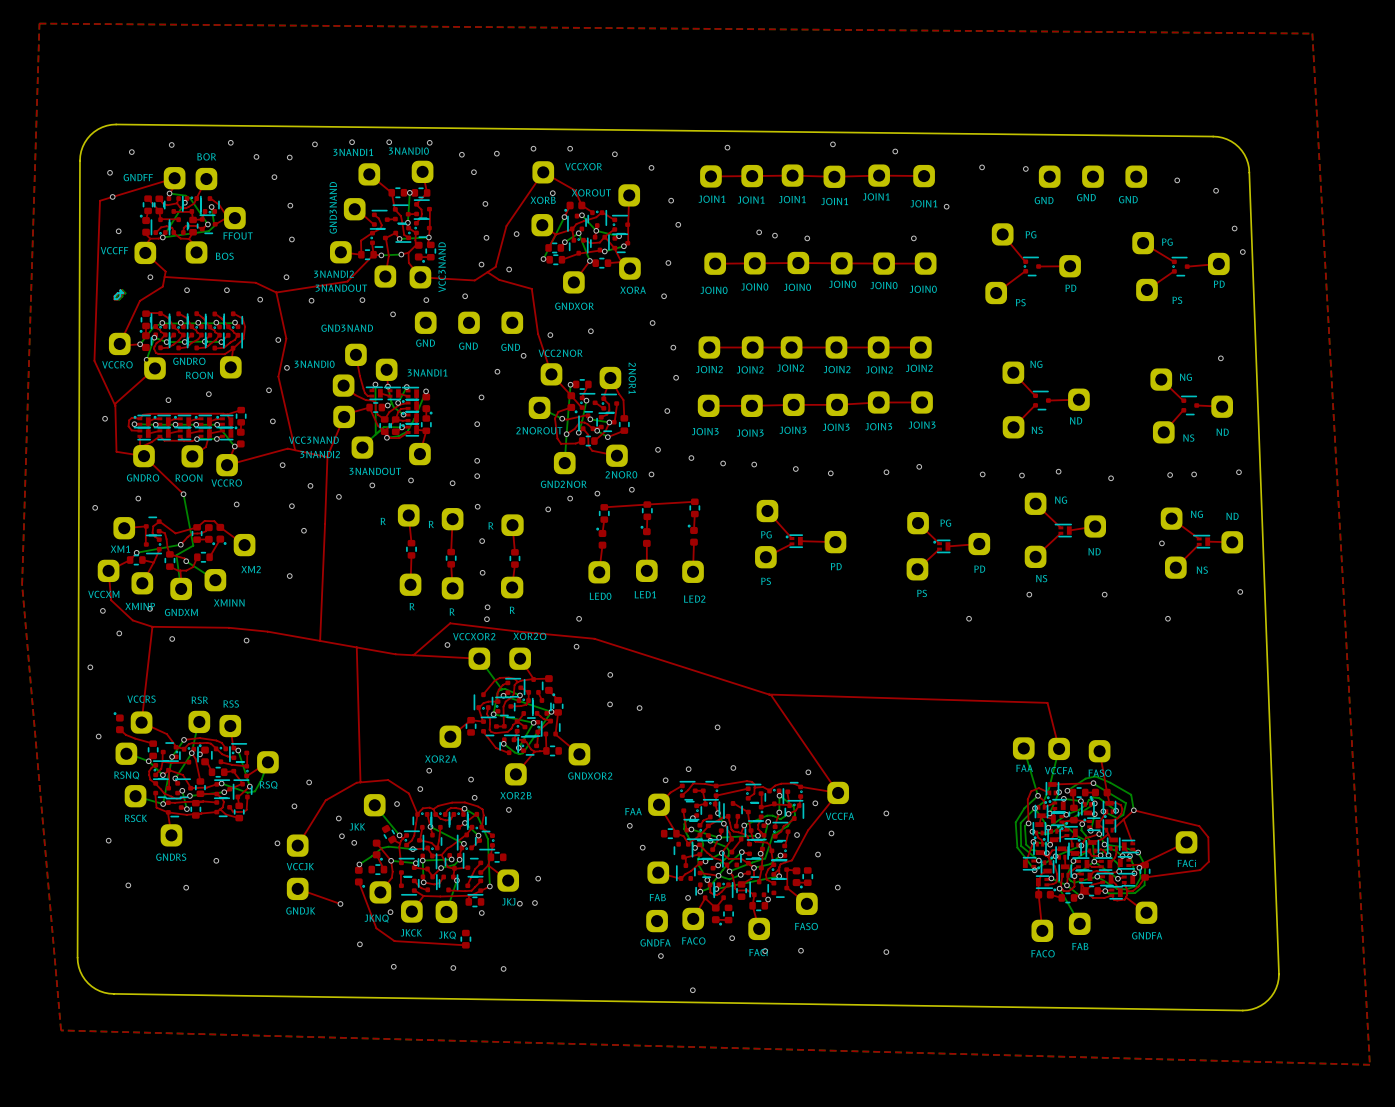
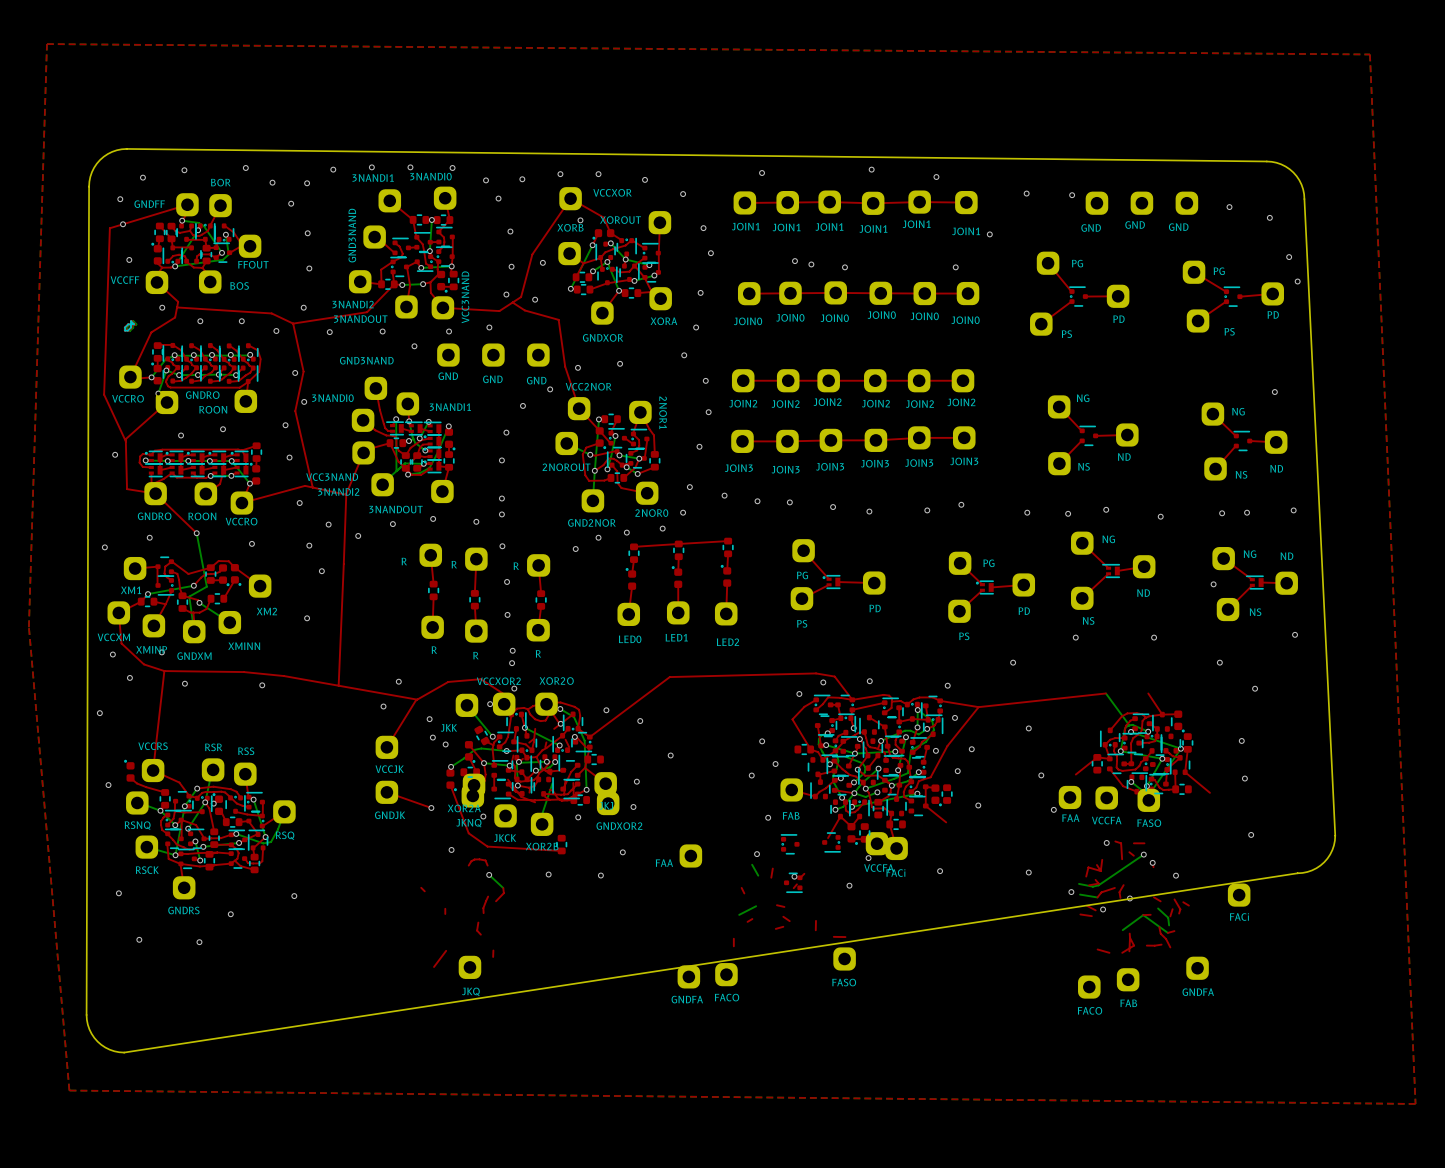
top zone outline: (1312, 33) (1369, 1064) (61, 1030) -> (1369, 54) (1415, 1103) (69, 1090)
board edge: (1249, 172) (1278, 974) (1274, 992) (1264, 1003) (1252, 1009) (1242, 1010) (113, 993) -> (1304, 199) (1335, 835) (1330, 854) (1320, 865) (1302, 872) (124, 1052)
via: (579, 618) -> none
via: none -> (869, 681)
via: none -> (398, 681)
via: none -> (823, 682)
via: none -> (947, 685)
via: none -> (514, 688)
via: none -> (1255, 688)
via: (447, 644) -> none
via position: (576, 646) -> (606, 710)
top track: (356, 647) (360, 782) -> none
via: none -> (799, 693)
top track: none -> (1105, 693) (978, 707)
bottom track: none -> (1105, 693) (1129, 725)
top track: none -> (1148, 693) (1162, 714)
top track: (395, 654) (479, 658) -> none
top track: none -> (852, 699) (889, 695) (891, 698) (891, 708) (884, 712)
top track: none -> (852, 699) (828, 697) (816, 709)
top track: none -> (852, 699) (834, 676) (816, 673) (669, 677) (589, 737) (578, 728) (580, 715) (579, 709) (574, 706) (560, 702) (547, 702) (527, 709)
top track: (413, 655) (450, 623) (594, 638) (771, 695) (838, 792) -> none
via: none -> (490, 704)
bottom track: (479, 658) (501, 689) -> none
part: none -> (823, 704)
part: none -> (845, 704)
via: none -> (383, 706)
part: none -> (932, 705)
part: none -> (891, 707)
via: none -> (560, 709)
via: none -> (917, 710)
part: none -> (912, 711)
top track: none -> (1162, 714) (1149, 716) (1142, 720) (1140, 733) (1133, 738) (1131, 743) (1131, 763) (1124, 763)
top track: none -> (1178, 714) (1162, 714)
via: none -> (954, 717)
top track: none -> (1146, 717) (1142, 714) (1127, 713) (1121, 716) (1110, 730)
top track: none -> (1135, 718) (1126, 725) (1124, 738) (1110, 739) (1105, 744) (1109, 758) (1097, 757) (1075, 774)
via: none -> (429, 719)
part: none -> (516, 721)
part: none -> (573, 721)
part: none -> (1162, 721)
part: none -> (1179, 721)
via: none -> (560, 723)
part: none -> (1142, 723)
top track: none -> (1149, 723) (1157, 729) (1155, 741) (1139, 743)
top track: (548, 678) (533, 679) (516, 682) (512, 696) (505, 701) (503, 706) (503, 726) (496, 726) -> none
part: none -> (869, 724)
part: none -> (824, 725)
part: none -> (845, 725)
part: none -> (892, 726)
part: none -> (933, 727)
via: none -> (524, 727)
via: none -> (853, 728)
bottom track: none -> (917, 727) (917, 710) (932, 721) (933, 729) (926, 741) (911, 750) (907, 773) (865, 788)
via: none -> (917, 727)
top track: (507, 682) (498, 689) (497, 701) (483, 703) (478, 708) (483, 721) (471, 720) (450, 736) -> none
top track: (518, 682) (514, 678) (499, 677) (494, 680) (483, 694) -> none
via: none -> (927, 728)
via: none -> (1028, 728)
part: (550, 685) -> none
bottom track: none -> (1131, 731) (1180, 748) (1151, 791) (1142, 790) (1131, 781)
via: none -> (1131, 731)
bottom track: none -> (1148, 731) (1132, 724) (1128, 725) (1125, 728) (1120, 751) (1162, 758) (1146, 786)
via: none -> (1148, 731)
part: (533, 686) -> none
via: none -> (827, 733)
part: (514, 687) -> none
top track: (521, 687) (528, 692) (526, 704) (511, 706) -> none
via: none -> (492, 736)
via: none -> (432, 737)
via: none -> (574, 736)
via: none -> (905, 737)
part: none -> (1110, 737)
part footprint: [473, 692, 494, 711] -> [496, 731, 517, 752]
top track: none -> (859, 739) (867, 755) (857, 769) (865, 775) (877, 775) (884, 780)
via: none -> (859, 739)
via: none -> (762, 741)
top track: (769, 694) (1047, 702) (1059, 748) -> none
top track: none -> (843, 741) (858, 732) (864, 732) (867, 745) (884, 752) (886, 760)
via: none -> (881, 740)
via: none -> (1241, 740)
bottom track: (503, 695) (551, 711) (522, 753) (514, 752) (503, 743) -> none
via: (503, 695) -> none
bottom track: (519, 695) (504, 688) (500, 689) (497, 692) (493, 714) (533, 722) (518, 747) -> none
via: (519, 695) -> none
part: none -> (582, 742)
part: none -> (526, 743)
part: none -> (562, 742)
part: none -> (1131, 743)
part: none -> (1152, 743)
part: none -> (1170, 743)
part: none -> (1187, 742)
via: none -> (445, 744)
top track: none -> (1115, 744) (1113, 750) (1116, 755) (1116, 767) (1122, 770) (1135, 769) (1152, 750)
via: none -> (559, 745)
via: none -> (826, 745)
part: none -> (828, 745)
part: none -> (850, 746)
part: none -> (894, 746)
bottom track: none -> (834, 747) (838, 760) (832, 775) (833, 782) (842, 797)
part: none -> (919, 747)
part: none -> (872, 748)
via: none -> (1180, 748)
part: none -> (804, 749)
via: none -> (971, 749)
via: none -> (506, 750)
via: none -> (935, 750)
via: none -> (1120, 751)
top track: none -> (1165, 750) (1172, 756) (1180, 757) (1167, 768)
top track: none -> (1176, 750) (1187, 749) (1185, 772) (1209, 792)
part: none -> (470, 751)
via: (610, 704) -> none
via: none -> (895, 751)
part: (504, 706) -> none
part: (523, 706) -> none
part rotation: 0° (558, 706) -> 90° clockwise (594, 759)
via: none -> (854, 753)
part: (541, 707) -> none
via: (551, 711) -> none
via: none -> (1162, 758)
top track: (537, 713) (543, 719) (550, 720) (538, 731) -> none
top track: (546, 713) (558, 712) (555, 734) (579, 754) -> none
via: none -> (546, 761)
via: none -> (555, 762)
via: none -> (484, 763)
part: none -> (549, 764)
via: none -> (775, 764)
via: none -> (829, 764)
part: none -> (1097, 763)
part: none -> (1116, 763)
part: none -> (1138, 763)
part: none -> (1160, 764)
via: none -> (509, 765)
part: none -> (521, 764)
part: none -> (893, 765)
part: none -> (1180, 765)
part: none -> (841, 766)
via: none -> (451, 766)
part: none -> (817, 767)
part: none -> (916, 767)
via: none -> (878, 768)
top track: none -> (1109, 768) (1123, 786) (1136, 791)
via: none -> (857, 769)
top track: none -> (1167, 769) (1165, 784)
part: none -> (501, 770)
via: none -> (535, 770)
via: (533, 722) -> none
part: none -> (570, 770)
via: none -> (898, 770)
via: none -> (957, 771)
bottom track: none -> (918, 772) (908, 781) (891, 785)
via: none -> (918, 772)
top track: none -> (1175, 772) (1175, 789) (1163, 790) (1154, 780) (1151, 779)
part rotation: 0° (471, 726) -> 90° clockwise (470, 772)
part position: (471, 726) -> (470, 772)
part: (489, 726) -> none
part: (510, 726) -> none
part: (531, 727) -> none
part: (550, 727) -> none
part: none -> (868, 775)
via: none -> (1041, 775)
via: none -> (840, 778)
via: none -> (1244, 778)
part: none -> (451, 780)
top track: (517, 731) (513, 739) (523, 740) -> none
top track: none -> (884, 780) (891, 784) (890, 792) (878, 802)
via: none -> (636, 781)
via: none -> (853, 782)
via: none -> (1131, 781)
part: none -> (1136, 784)
part: none -> (1158, 784)
part: none -> (841, 785)
part: none -> (892, 785)
via: none -> (517, 785)
part: none -> (522, 786)
via: none -> (891, 785)
via: none -> (1146, 786)
part: none -> (543, 786)
part: none -> (918, 786)
part: none -> (501, 789)
part: none -> (570, 789)
part: none -> (820, 789)
via: none -> (865, 788)
part: none -> (1182, 789)
via: none -> (586, 789)
via: (503, 743) -> none
via: none -> (877, 792)
via: none -> (854, 793)
via: none -> (917, 793)
part: (530, 745) -> none
part: none -> (947, 794)
part: (509, 746) -> none
part: none -> (936, 795)
via: (518, 747) -> none
top track: none -> (842, 797) (845, 802) (845, 810) (849, 812) (854, 812) (864, 802)
via: none -> (842, 797)
bottom track: (1023, 748) (1038, 795) (1024, 808) (1015, 822) (1017, 847) (1034, 870) (1055, 856) (1081, 845) -> none
bottom track: (1059, 748) (1049, 788) (1043, 802) (1034, 808) -> none
top track: (534, 751) (515, 774) -> none
top track: (1099, 751) (1109, 803) (1116, 802) (1120, 805) (1122, 808) (1117, 818) (1109, 821) -> none
part: none -> (896, 806)
part: none -> (918, 805)
via: none -> (978, 805)
via: none -> (633, 806)
via: none -> (851, 806)
via: none -> (431, 807)
part: none -> (840, 809)
part: none -> (859, 809)
part: none -> (878, 808)
via: none -> (835, 809)
via: none -> (1053, 809)
via: none -> (483, 816)
via: none -> (578, 817)
via: (688, 769) -> none
via: (429, 770) -> none
via: (808, 772) -> none
part: none -> (896, 824)
via: (471, 779) -> none
via: (665, 780) -> none
via: (309, 782) -> none
part: none -> (864, 832)
part: none -> (852, 833)
top track: (1093, 783) (1052, 784) -> none
bottom track: (1093, 783) (1126, 803) (1123, 815) (1117, 818) (1103, 811) -> none
via: (1093, 783) -> none
via: none -> (1251, 834)
top track: (681, 785) (670, 792) (658, 804) (676, 833) (683, 836) (688, 843) (708, 825) -> (816, 699) (804, 706) (792, 719) (810, 749) (818, 752) (822, 759) (844, 741)
top track: (754, 787) (763, 787) (769, 790) (781, 783) (793, 783) (801, 786) (838, 792) -> (891, 701) (900, 700) (907, 704) (919, 697) (932, 697) (940, 700) (978, 707)
top track: (747, 788) (716, 795) (715, 803) (717, 813) -> (884, 702) (852, 709) (850, 718) (853, 728)
via position: (420, 789) -> (451, 849)
part: (688, 790) -> none
top track: (695, 790) (702, 790) (705, 803) (697, 805) -> (830, 704) (837, 704) (840, 718) (832, 720)
part: (709, 790) -> none
part: (1052, 790) -> none
bottom track: (1067, 790) (1085, 778) (1095, 776) (1131, 794) (1133, 810) -> none
via: (1067, 790) -> none
top track: (787, 791) (789, 805) (774, 804) (761, 807) (761, 793) -> (925, 705) (928, 719) (912, 718) (899, 721) (899, 707)
top track: (838, 792) (808, 830) (791, 860) (780, 864) (778, 870) (773, 874) -> (978, 707) (947, 745) (930, 777) (918, 781) (916, 787) (911, 791)
top track: (1049, 792) (1038, 788) (1031, 791) (1027, 799) (1028, 823) -> none
bottom track: (1059, 792) (1049, 813) -> none
part: (1079, 792) -> none
part: none -> (561, 844)
part: (1100, 793) -> none
top track: (681, 795) (693, 783) (716, 785) (746, 781) (754, 784) (754, 793) (747, 798) -> none
via: (779, 795) -> none
top track: (1038, 795) (1044, 801) (1044, 807) (1054, 803) -> none
via: (1038, 795) -> none
top track: (801, 796) (795, 810) (788, 813) -> (940, 710) (934, 725) (927, 728)
via: (474, 797) -> none
part: (774, 797) -> none
bottom track: (1063, 798) (1080, 801) -> none
via: (1063, 798) -> none
via: none -> (622, 852)
via: (1080, 801) -> none
via: none -> (757, 854)
top track: (733, 803) (747, 811) (753, 839) (755, 841) (767, 842) (769, 845) (773, 864) (766, 874) (766, 879) (773, 883) -> (869, 717) (884, 726) (890, 755) (892, 757) (904, 758) (907, 761) (911, 781) (903, 792) (904, 797) (911, 800)
via: (815, 803) -> none
via: (397, 804) -> none
bottom track: (374, 805) (399, 835) -> (466, 705) (492, 736)
part position: (374, 805) -> (466, 705)
part: (1057, 805) -> none
via: (294, 806) -> none
via: none -> (868, 858)
part: (1087, 807) -> none
bottom track: (464, 808) (477, 816) (487, 839) (489, 886) -> (560, 709) (574, 717) (584, 740) (586, 789)
via: (464, 808) -> none
bottom track: (1034, 808) (1020, 822) (1021, 845) (1038, 860) -> none
bottom track: (1034, 808) (1048, 827) (1066, 814) (1078, 809) (1093, 797) (1099, 798) (1116, 810) -> none
via: (1034, 808) -> none
top track: (433, 809) (422, 808) (417, 813) -> (527, 709) (516, 708) (511, 714)
top track: (433, 809) (440, 818) (445, 820) (450, 819) (453, 813) -> (527, 709) (535, 719) (540, 721) (545, 720) (549, 714)
top track: (433, 809) (452, 802) (464, 802) (478, 806) (482, 809) (483, 815) (481, 827) (492, 835) -> none
via position: (508, 809) -> (548, 874)
part: (1041, 809) -> none
part: (1109, 809) -> none
top track: (683, 810) (686, 830) (691, 829) -> (817, 725) (821, 745) (826, 745)
part: (690, 810) -> none
part: (710, 810) -> none
part: (733, 810) -> none
via: (1116, 810) -> none
via: (1133, 810) -> none
part: (754, 811) -> none
part: (794, 811) -> none
top track: (1106, 811) (1098, 824) (1106, 830) (1111, 840) -> none
top track: (779, 812) (774, 826) -> (917, 727) (912, 742)
bottom track: (779, 812) (779, 795) (793, 806) (795, 814) (787, 826) (773, 834) (765, 858) (729, 871) -> none
via: (779, 812) -> none
top track: (417, 813) (408, 793) (388, 780) (356, 782) (325, 800) (297, 845) -> (511, 714) (502, 693) (480, 679) (448, 681) (415, 700) (386, 747)
top track: (417, 813) (414, 835) (406, 845) -> (511, 714) (508, 736) (499, 746)
top track: (427, 813) (432, 834) -> (521, 714) (526, 735)
top track: (476, 813) (458, 827) -> (573, 714) (554, 728)
via: (717, 813) -> none
bottom track: (788, 813) (780, 819) (767, 815) (744, 825) -> (927, 728) (918, 734) (904, 730) (881, 740)
via: (788, 813) -> none
via position: (886, 813) -> (940, 871)
via: (1049, 813) -> none
via: (1066, 814) -> none
part: (1073, 814) -> none
bottom track: (1094, 814) (1090, 830) -> none
via: (1094, 814) -> none
top track: (761, 816) (758, 829) (764, 835) -> (899, 731) (895, 744) (902, 751)
top track: (710, 817) (703, 820) (700, 825) -> (845, 732) (838, 735) (835, 740)
via: (338, 818) -> none
bottom track: (692, 818) (686, 820) (684, 828) (695, 847) -> (827, 733) (820, 735) (818, 744) (829, 764)
via: (692, 818) -> none
top track: (794, 819) (783, 826) (781, 831) (774, 836) -> (933, 734) (921, 741) (919, 747) (912, 752)
part: (1059, 819) -> none
top track: (1123, 819) (1132, 843) -> none
part: (422, 820) -> none
part: (440, 820) -> none
part: (458, 820) -> none
part: (476, 820) -> none
via: none -> (1028, 872)
bottom track: (768, 821) (760, 853) -> (905, 737) (898, 770)
via: (768, 821) -> none
top track: (1089, 821) (1073, 820) (1061, 821) (1066, 830) (1056, 831) -> none
via: none -> (600, 875)
top track: (723, 823) (731, 839) (721, 853) (729, 859) (741, 858) (753, 867) (753, 875) (741, 884) -> none
via: (723, 823) -> none
bottom track: (1028, 823) (1024, 825) (1026, 844) (1031, 849) (1046, 853) -> none
via: (1028, 823) -> none
via: none -> (1176, 875)
via: none -> (794, 876)
bottom track: (1063, 824) (1084, 839) (1087, 844) (1085, 852) (1073, 861) (1067, 873) (1070, 880) (1074, 882) (1097, 876) (1117, 888) (1126, 889) (1135, 886) (1140, 877) (1139, 867) -> none
bottom track: (1082, 824) (1081, 830) (1093, 845) (1094, 861) -> none
via: (1082, 824) -> none
part: (1092, 824) -> none
via: (629, 825) -> none
top track: (707, 825) (722, 817) (728, 816) (731, 829) (741, 833) -> none
top track: (744, 825) (741, 833) -> (881, 740) (877, 749)
via: (744, 825) -> none
bottom track: (430, 826) (463, 843) -> (524, 727) (559, 745)
via: (430, 826) -> none
top track: (422, 827) (420, 840) (431, 842) (437, 848) (440, 827) -> (516, 728) (514, 741) (525, 744) (531, 750) (535, 728)
top track: (472, 827) (441, 855) -> (568, 728) (562, 735) (542, 750) (536, 757)
via: (1048, 827) -> none
part: (1109, 827) -> none
bottom track: (691, 829) (719, 837) (757, 835) -> (826, 745) (854, 753) (895, 751)
via: (691, 829) -> none
part: (693, 830) -> none
part: (714, 830) -> none
top track: (722, 830) (713, 849) -> (858, 746) (848, 766)
part: (1039, 830) -> none
via: (1090, 830) -> none
top track: (1112, 830) (1133, 810) (1199, 826) (1208, 837) (1208, 861) (1200, 870) (1145, 877) (1133, 890) (1127, 891) -> none
bottom track: (699, 831) (703, 844) (697, 859) (698, 865) (707, 880) -> none
part: (781, 831) -> none
top track: (788, 831) (785, 845) -> (927, 747) (923, 762)
top track: (1032, 831) (1036, 832) (1042, 844) -> none
via: (1032, 831) -> none
part: (736, 832) -> none
part: (1069, 832) -> none
part: (670, 833) -> none
top track: (741, 833) (747, 836) (749, 844) -> none
via: none -> (849, 885)
via: (831, 833) -> none
part: (1054, 833) -> none
part position: (389, 834) -> (482, 735)
top track: (1099, 834) (1085, 837) (1081, 845) (1077, 845) -> none
bottom track: (1099, 834) (1104, 844) (1123, 847) (1138, 852) (1145, 865) (1144, 885) (1135, 893) (1104, 892) -> none
via: (1099, 834) -> none
top track: (1108, 834) (1102, 839) (1092, 842) -> none
via: (399, 835) -> none
top track: (406, 835) (400, 840) (399, 846) (400, 862) -> (499, 736) (494, 742) (492, 748) (494, 765)
via: (478, 835) -> none
via: (757, 835) -> none
via: (797, 835) -> none
via: (341, 836) -> none
via: (719, 837) -> none
top track: (392, 839) (400, 843) -> (485, 741) (493, 745)
top track: (741, 839) (731, 851) -> (877, 755) (868, 768)
via: none -> (1071, 892)
part: (412, 840) -> none
part: (486, 840) -> none
bottom track: (710, 840) (726, 846) (729, 850) (728, 855) (718, 865) -> (845, 756) (862, 763) (865, 767) (864, 772) (853, 782)
via: (710, 840) -> none
part: (432, 841) -> none
part: (466, 841) -> none
via: (1033, 841) -> none
via: (354, 842) -> none
top track: (1186, 842) (1140, 864) -> none
top track: (376, 843) (391, 860) (392, 871) (391, 877) (380, 892) -> (468, 744) (484, 763) (485, 774) (484, 780) (472, 795)
via: (463, 843) -> none
top track: (1037, 844) (1033, 841) (1025, 863) -> none
via: (1050, 844) -> none
via: (1104, 844) -> none
part position: (297, 845) -> (386, 747)
top track: (492, 845) (488, 865) -> (589, 747) (584, 767)
part: (1113, 845) -> none
part: (1039, 846) -> none
part: (1130, 846) -> none
via: (642, 847) -> none
top track: (695, 847) (699, 844) (714, 858) (720, 859) (727, 865) (737, 890) (747, 890) (754, 895) (752, 905) (759, 928) -> (829, 764) (834, 761) (849, 775) (856, 776) (863, 782) (873, 808) (884, 808) (891, 813) (889, 824) (896, 848)
via: (695, 847) -> none
part: (1075, 847) -> none
part: (755, 848) -> none
part: (1092, 848) -> none
top track: (1116, 848) (1115, 857) (1109, 864) -> none
part: (377, 849) -> none
top track: (412, 849) (427, 848) (432, 855) (441, 855) -> (506, 750) (521, 750) (526, 757) (536, 757)
bottom track: (412, 849) (388, 846) (382, 848) (359, 864) -> (506, 750) (481, 748) (474, 749) (451, 766)
via: (412, 849) -> none
part: (706, 849) -> none
part: (683, 850) -> none
part: (778, 850) -> none
top track: (1095, 850) (1100, 849) (1108, 855) -> none
bottom track: (741, 852) (718, 875) -> (878, 768) (854, 793)
via: (741, 852) -> none
via: (1138, 852) -> none
via: (721, 853) -> none
top track: (760, 853) (762, 848) (759, 881) -> (898, 770) (900, 765) (896, 799)
via: (760, 853) -> none
via: (1046, 853) -> none
top track: (376, 854) (384, 869) -> (468, 756) (476, 772)
top track: (699, 854) (685, 857) (685, 865) -> (834, 771) (820, 774) (820, 782)
via: (818, 854) -> none
part: (1062, 854) -> none
top track: (441, 855) (447, 867) (467, 867) -> (536, 757) (542, 769) (549, 771) (563, 770)
bottom track: (780, 855) (770, 864) (753, 867) -> none
via: (780, 855) -> none
top track: (1100, 855) (1092, 855) (1089, 850) (1075, 853) (1062, 848) (1052, 850) (1048, 857) (1050, 862) (1054, 865) (1057, 879) (1053, 884) (1046, 884) -> none
bottom track: (1100, 855) (1104, 850) (1109, 848) (1122, 855) -> none
via: (1100, 855) -> none
via: (1108, 855) -> none
via: (1122, 855) -> none
bottom track: (1129, 856) (1134, 873) -> none
via: (1129, 856) -> none
part: (497, 857) -> none
top track: (1064, 857) (1065, 866) -> none
part: (731, 858) -> none
bottom track: (451, 859) (422, 860) (423, 882) -> (546, 761) (516, 762) (517, 785)
via: (451, 859) -> none
bottom track: (459, 859) (454, 864) (441, 868) -> (555, 762) (549, 767) (535, 770)
via: (459, 859) -> none
bottom track: (391, 860) (415, 863) -> (484, 763) (509, 765)
via: (391, 860) -> none
via: (422, 860) -> none
via: (1038, 860) -> none
part: (454, 861) -> none
top track: (705, 861) (699, 863) (681, 878) (658, 872) -> (840, 778) (834, 780) (815, 796) (791, 789)
via: (705, 861) -> none
via: (1073, 861) -> none
via: (1094, 861) -> none
part: (427, 862) -> none
top track: (481, 862) (474, 869) (467, 885) -> (577, 765) (571, 772) (563, 789)
part: (1126, 862) -> none
top track: (415, 863) (414, 867) (427, 869) (432, 876) (441, 868) -> (509, 765) (508, 770) (521, 772) (527, 779) (535, 770)
via: (415, 863) -> none
part: (1031, 863) -> none
via: (359, 864) -> none
part: (1080, 864) -> none
top track: (1086, 864) (1092, 866) (1101, 866) -> none
part: (1103, 864) -> none
top track: (1140, 864) (1129, 865) -> none
top track: (488, 865) (481, 872) -> (584, 767) (577, 775)
top track: (488, 865) (508, 880) -> (584, 767) (605, 783)
via: (718, 865) -> none
part: (1047, 865) -> none
top track: (1078, 866) (1067, 875) (1066, 885) -> none
part: (407, 867) -> none
part: (474, 867) -> none
via: (753, 867) -> none
via: (1139, 867) -> none
via: (441, 868) -> none
part: (706, 868) -> none
part: (754, 868) -> none
part: (377, 869) -> none
part: (780, 869) -> none
top track: (796, 870) (787, 869) (787, 888) (806, 903) -> (935, 788) (925, 786) (925, 805) (946, 822)
via: (1034, 870) -> none
via: (729, 871) -> none
top track: (1047, 871) (1041, 873) (1038, 882) (1042, 930) -> none
top track: (1119, 871) (1109, 873) (1096, 871) (1093, 871) (1089, 876) -> none
via: (1119, 871) -> none
part: (1145, 871) -> none
top track: (400, 872) (400, 885) -> (494, 775) (494, 789)
part position: (658, 872) -> (791, 789)
part: (685, 872) -> none
top track: (699, 872) (718, 875) -> (834, 790) (854, 793)
part: (1065, 872) -> none
top track: (1079, 873) (1074, 874) (1074, 886) (1068, 891) (1063, 890) -> none
via: (1134, 873) -> none
bottom track: (740, 874) (729, 879) (718, 875) -> (877, 792) (865, 796) (854, 793)
via: (740, 874) -> none
bottom track: (718, 875) (707, 888) (700, 891) -> (854, 793) (843, 806) (835, 809)
via: (718, 875) -> none
top track: (1062, 875) (1061, 887) (1063, 890) -> none
top track: (422, 876) (423, 882) (434, 884) (439, 882) (443, 876) -> (517, 779) (517, 785) (528, 787) (534, 786) (538, 779)
bottom track: (779, 876) (716, 889) -> (917, 793) (851, 806)
via: (779, 876) -> none
part: (807, 876) -> none
via: (1074, 876) -> none
part: (1083, 876) -> none
via: (1097, 876) -> none
part: (359, 877) -> none
part: (797, 877) -> none
via: (538, 878) -> none
bottom track: (1051, 878) (1066, 885) (1080, 896) -> none
via: (1051, 878) -> none
via: (1117, 878) -> none
part: (1105, 879) -> none
part: (1126, 879) -> none
top track: (414, 880) (421, 888) (427, 890) -> (508, 784) (515, 791) (522, 793)
bottom track: (456, 880) (446, 911) -> (552, 783) (541, 816)
via: (456, 880) -> none
top track: (481, 880) (471, 890) (448, 890) -> (577, 784) (567, 794) (543, 793)
part position: (508, 880) -> (605, 783)
top track: (707, 880) (709, 884) (710, 892) (713, 894) (718, 894) (728, 884) -> none
via: (707, 880) -> none
top track: (358, 881) (376, 928) (394, 941) (465, 945) -> (450, 785) (468, 833) (487, 846) (561, 850)
via: (423, 882) -> none
part: (1044, 882) -> none
top track: (1102, 882) (1092, 884) (1085, 890) (1092, 897) (1111, 895) (1113, 899) (1124, 899) (1127, 890) (1124, 882) -> none
part: (427, 883) -> none
part: (448, 883) -> none
part: (408, 885) -> none
part: (474, 885) -> none
via: (1066, 885) -> none
top track: (489, 886) (470, 895) (423, 896) (414, 890) -> (586, 789) (566, 799) (517, 799) (508, 794)
via: (489, 886) -> none
via: (837, 887) -> none
top track: (297, 888) (340, 903) -> (386, 792) (431, 807)
part position: (297, 888) -> (386, 792)
part: (759, 888) -> none
part: (780, 888) -> none
bottom track: (1059, 888) (1079, 923) -> none
via: (1059, 888) -> none
via: (716, 889) -> none
part: (741, 890) -> none
part: (1091, 890) -> none
via: (700, 891) -> none
part: (705, 891) -> none
part: (723, 891) -> none
via: (1105, 891) -> none
part position: (380, 892) -> (472, 795)
part: (1114, 892) -> none
part: (1045, 893) -> none
via: (1080, 896) -> none
via: (688, 897) -> none
part: (1067, 897) -> none
top track: (1125, 897) (1146, 912) -> none
top track: (723, 898) (715, 908) (705, 898) (693, 918) -> (859, 816) (851, 826) (840, 816) (828, 838)
via: (768, 899) -> none
part: (474, 901) -> none
via: (340, 903) -> none
via: (519, 903) -> none
via: (534, 903) -> none
part: (758, 905) -> none
part position: (411, 911) -> (505, 815)
via: (390, 912) -> none
via: (481, 913) -> none
part: (728, 913) -> none
part: (716, 914) -> none
top track: (715, 919) (728, 920) -> (851, 838) (864, 839)
part position: (759, 928) -> (896, 848)
via: (732, 938) -> none
part: (465, 939) -> none
via: (359, 944) -> none
via: (801, 950) -> none
via: (765, 951) -> none
via: (886, 952) -> none
via: (660, 956) -> none
via: (393, 966) -> none
via: (453, 967) -> none
via: (503, 968) -> none
via: (692, 990) -> none

